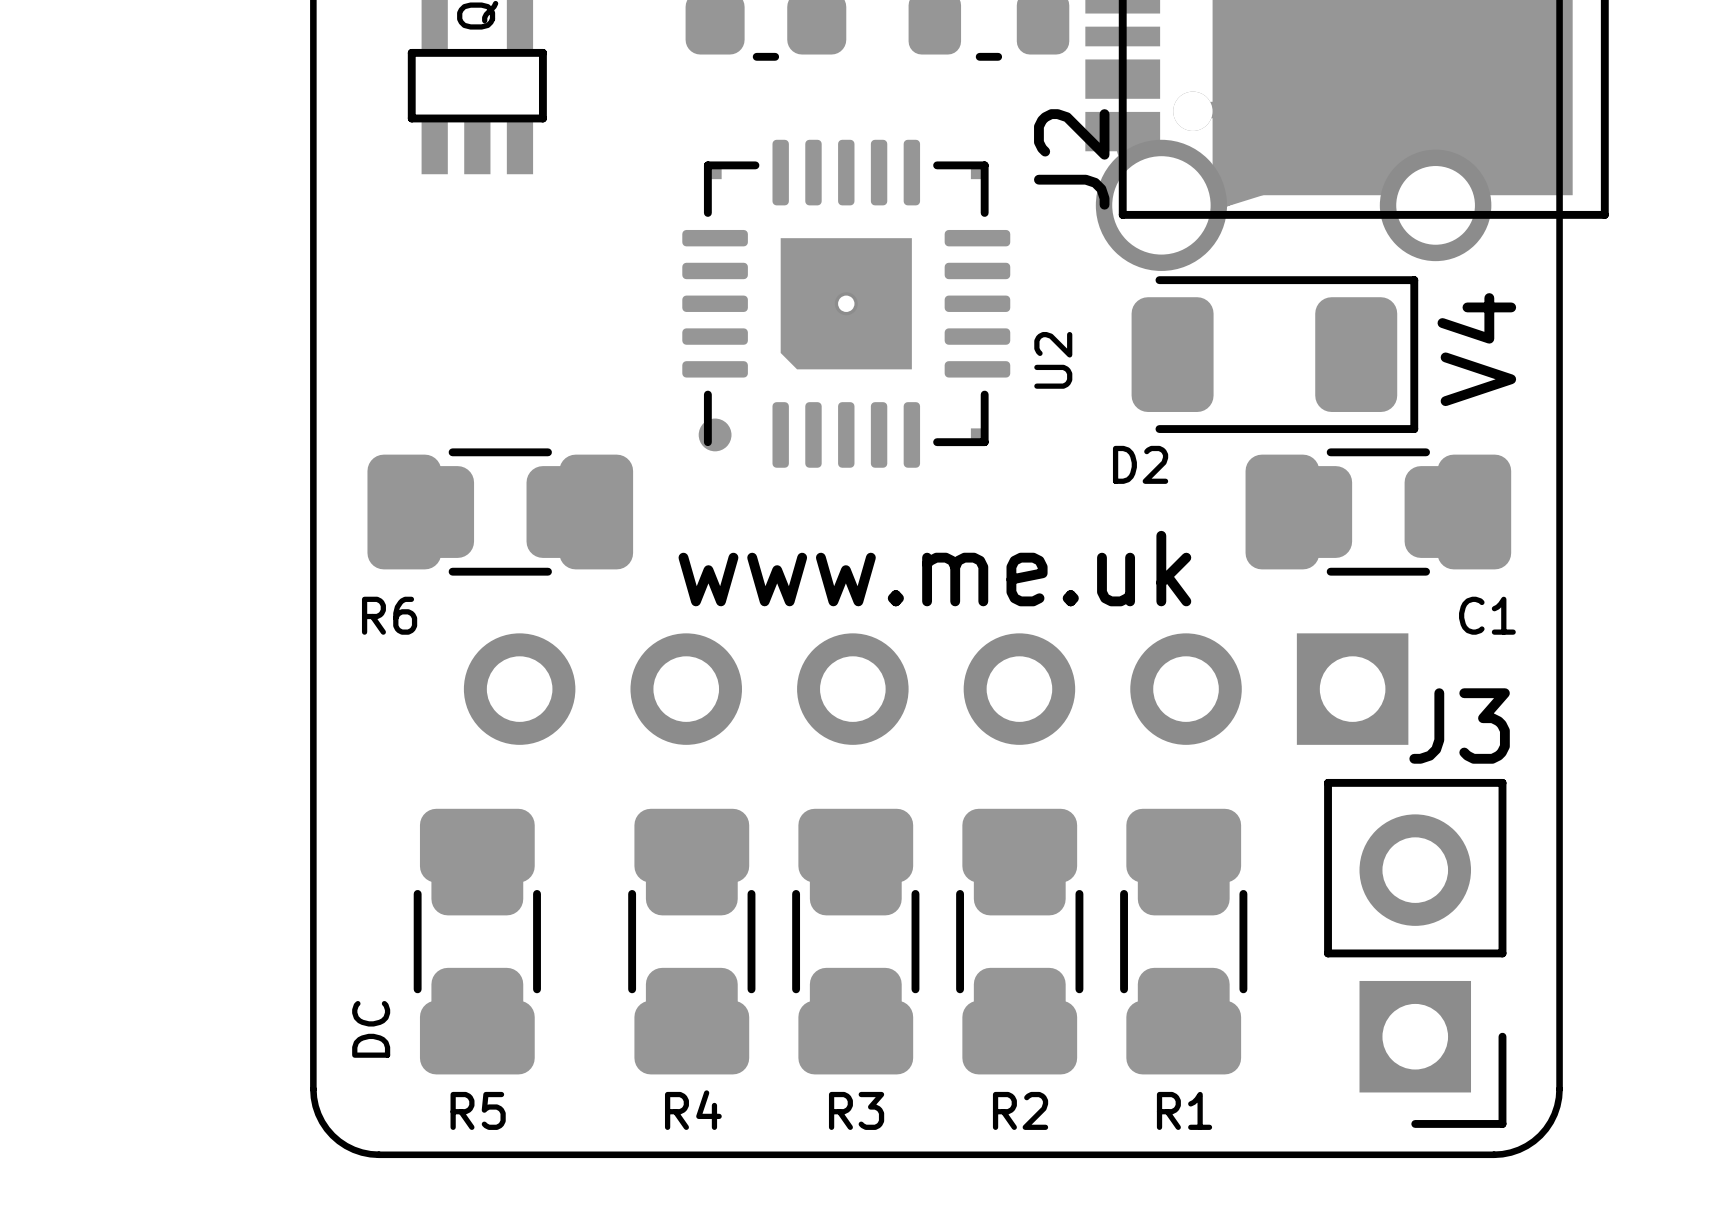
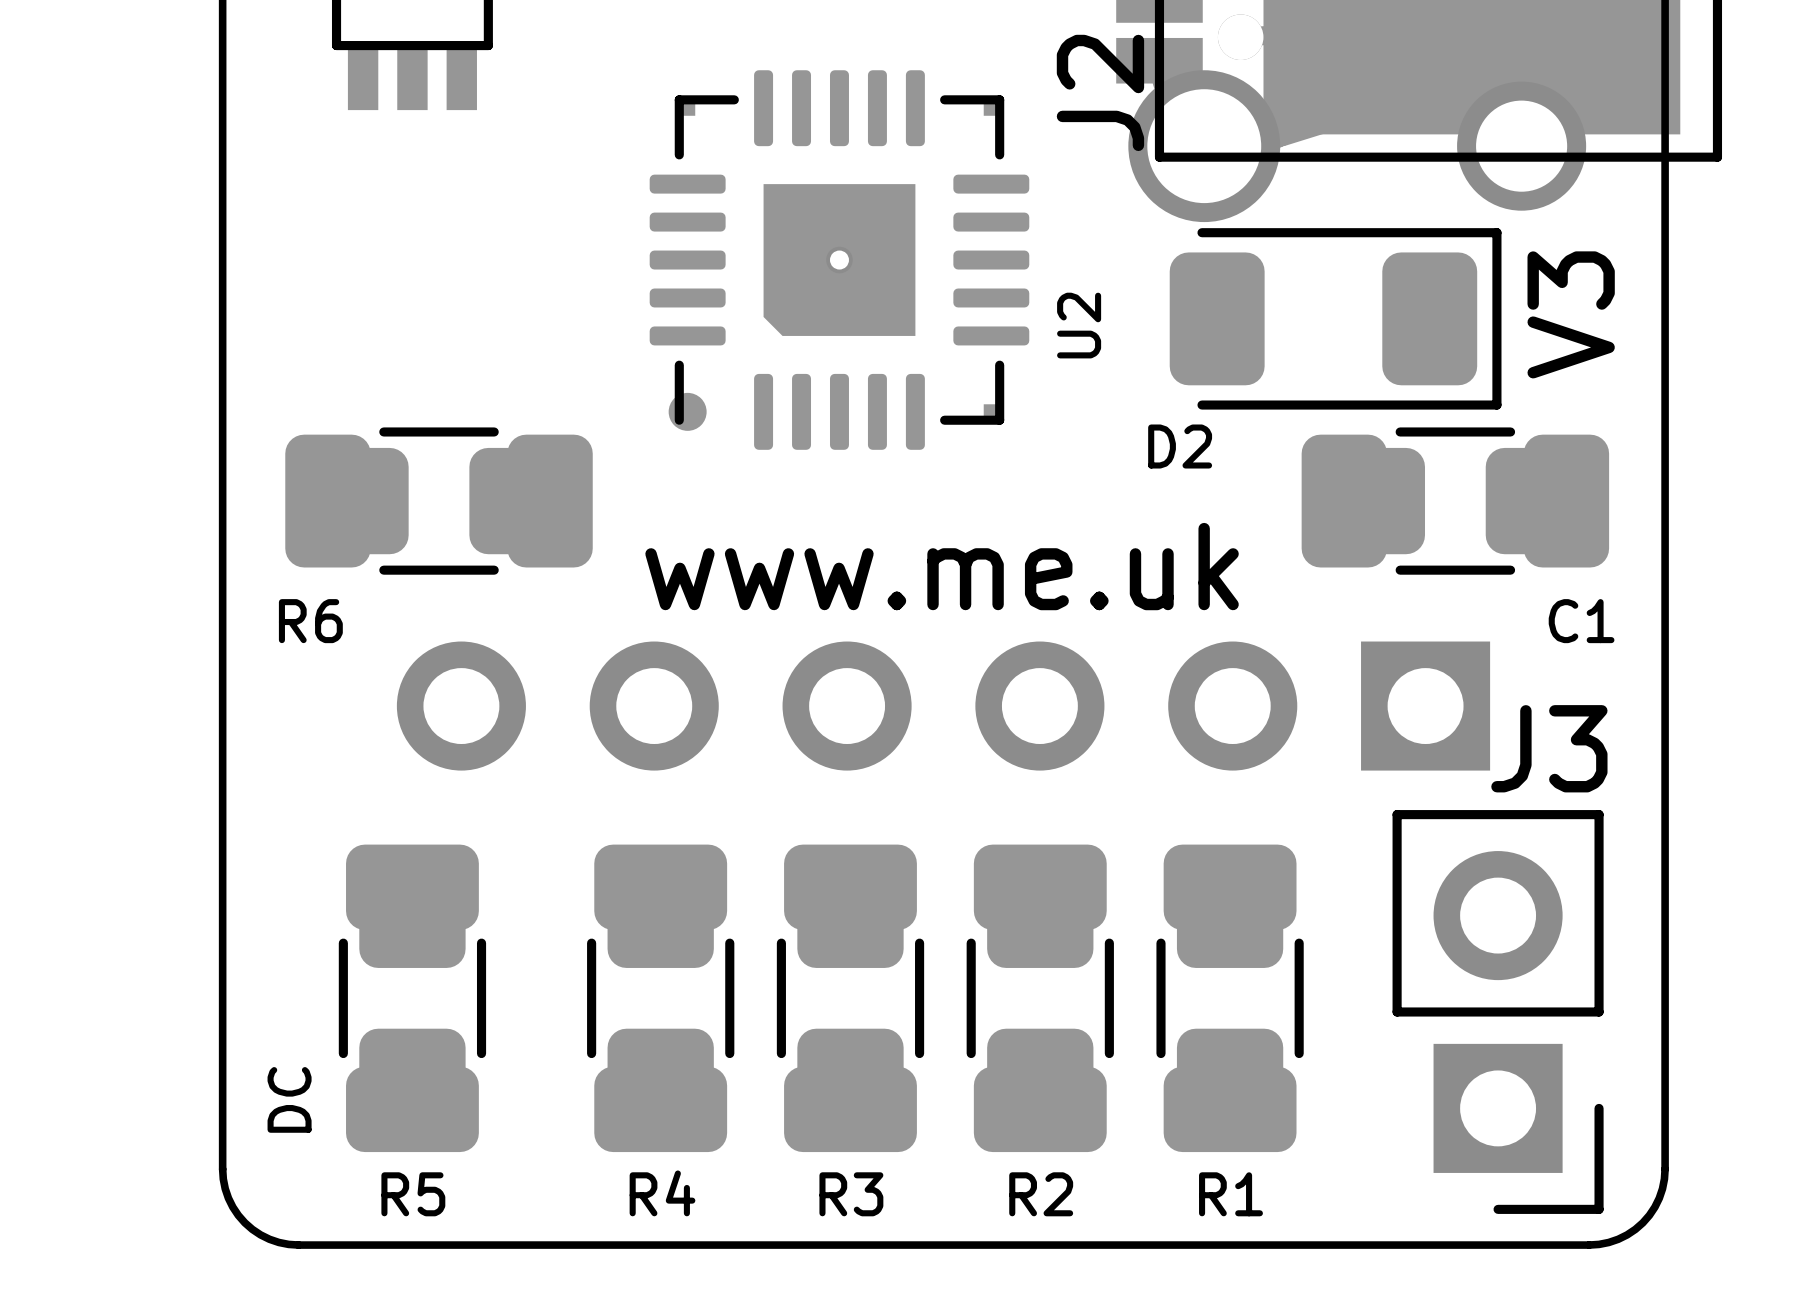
text: V4 (1476, 349) -> V3 (1571, 314)

